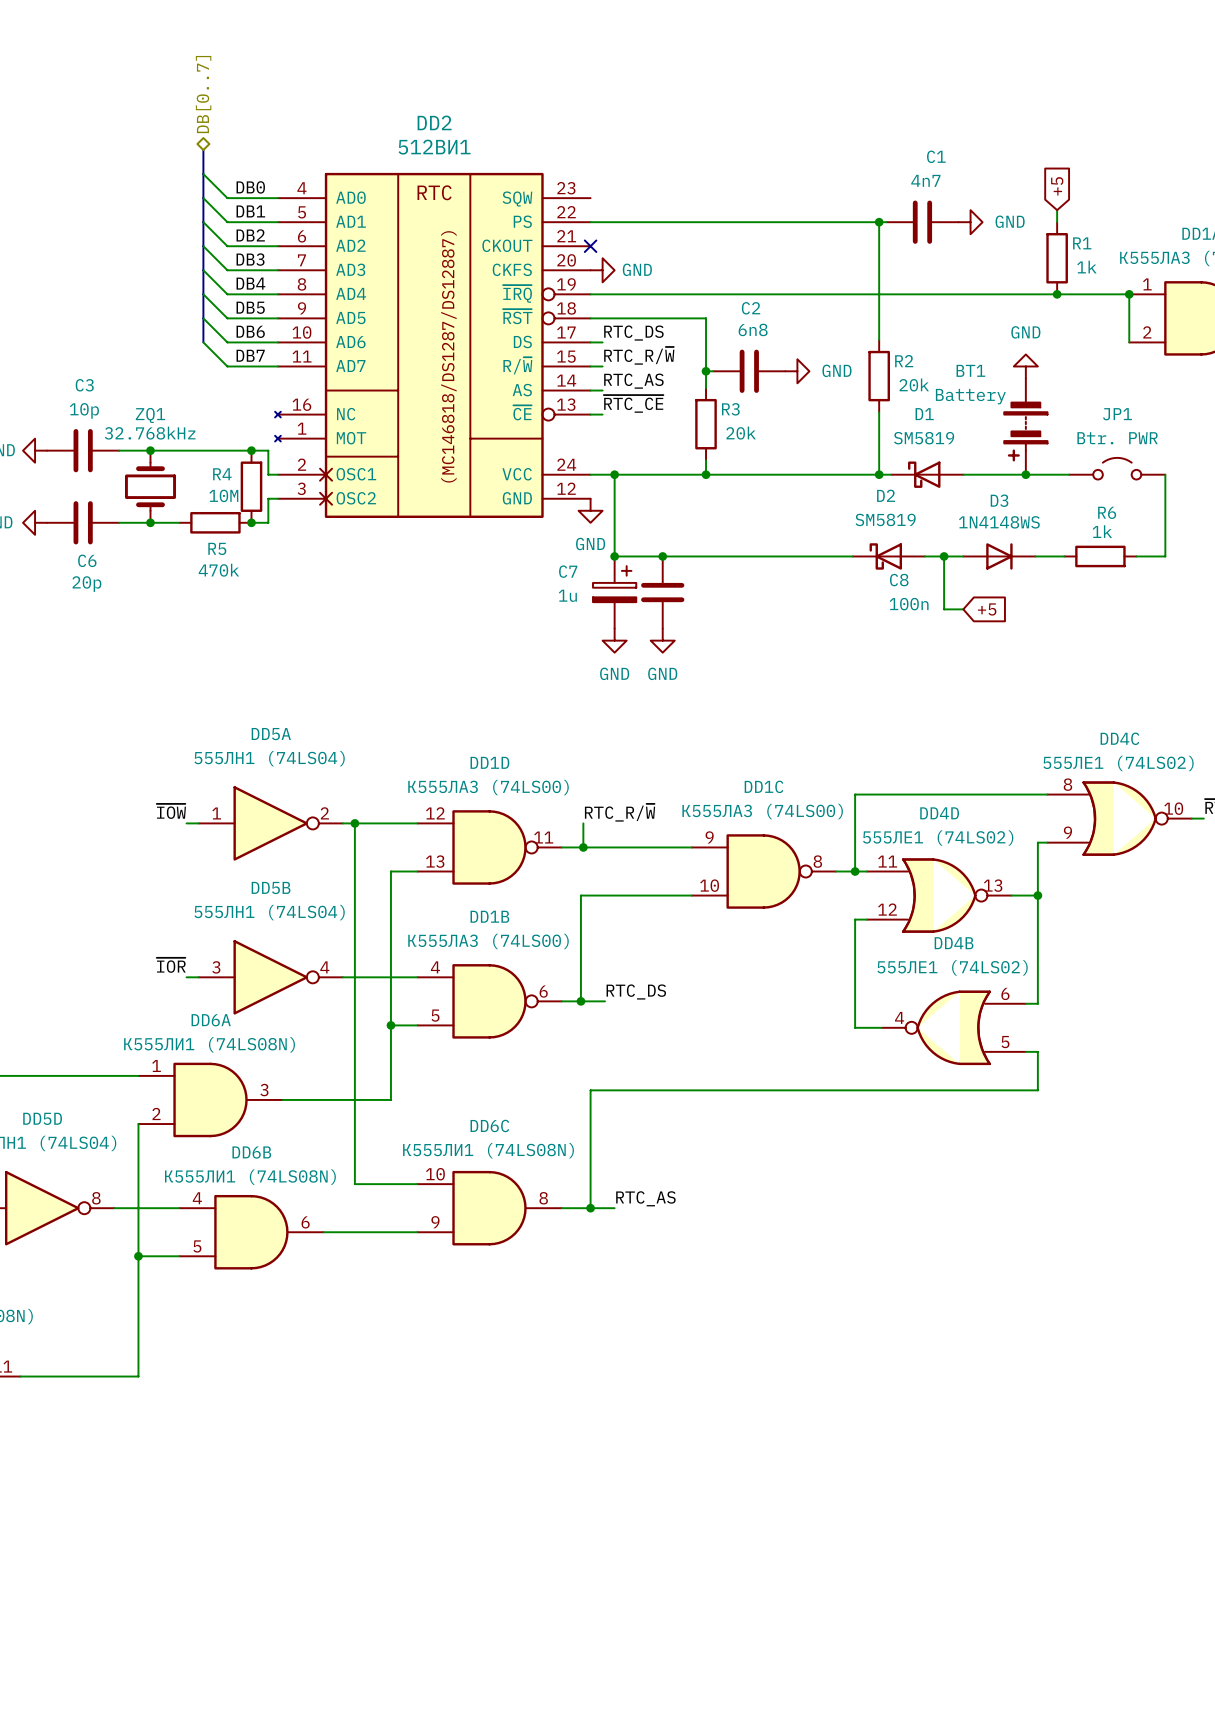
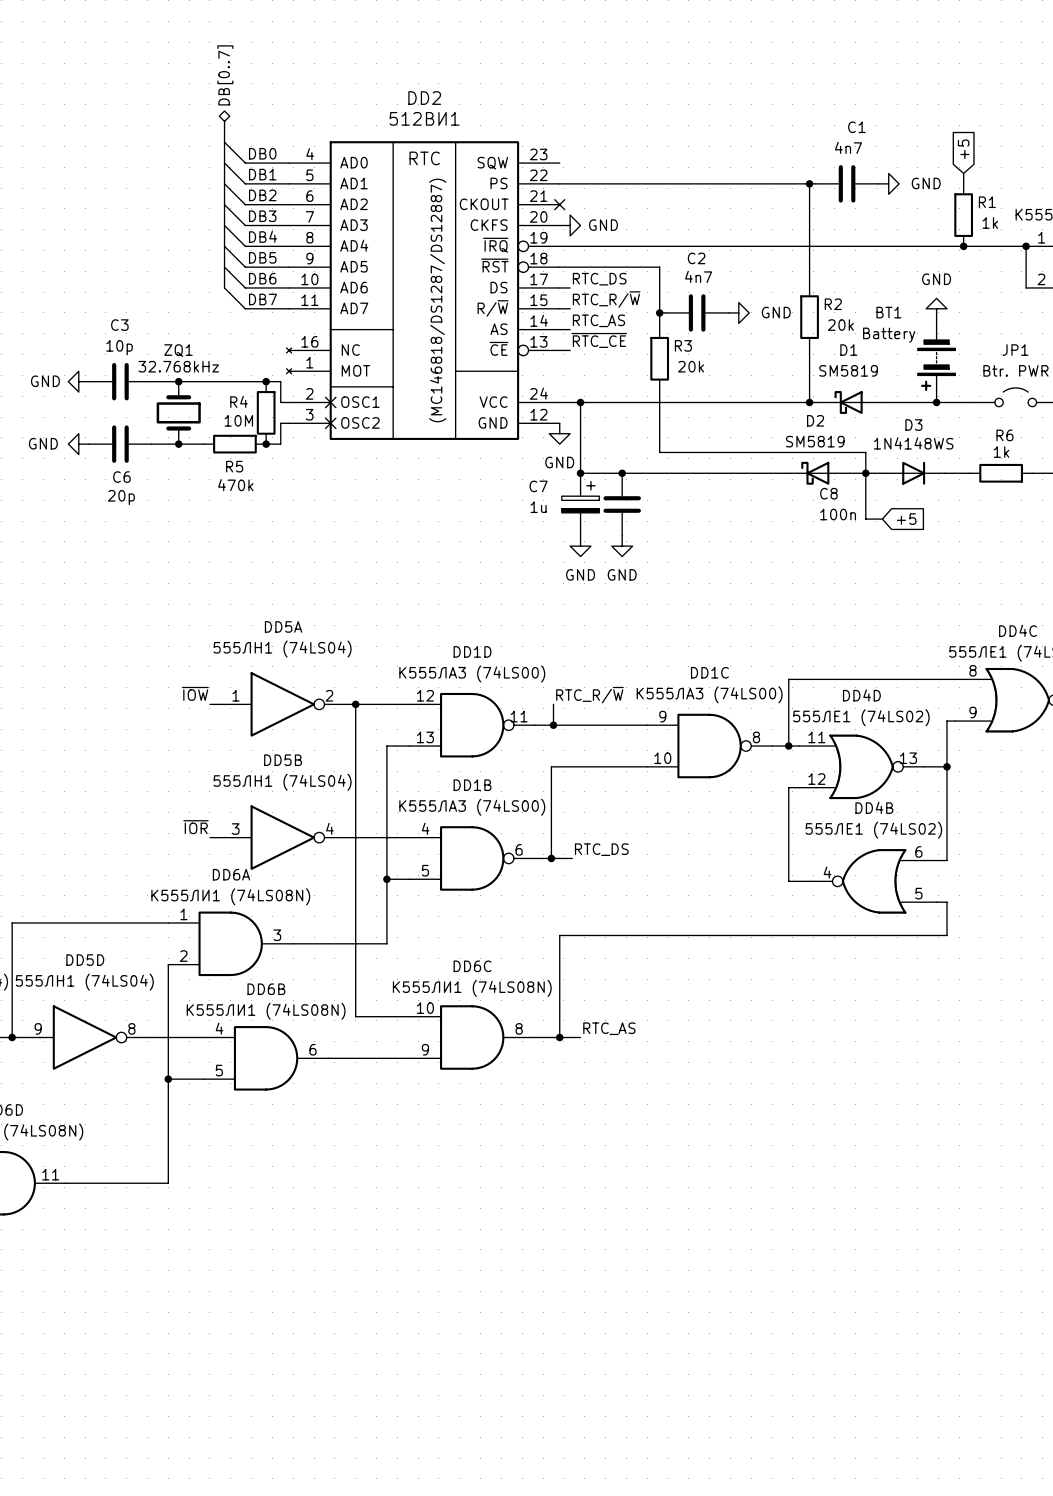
C2 value: 6n8 (753, 329) -> 4n7 (698, 276)
wire: none -> (659, 402) (659, 452) (865, 452) (865, 473)
junction: (706, 474) -> none

